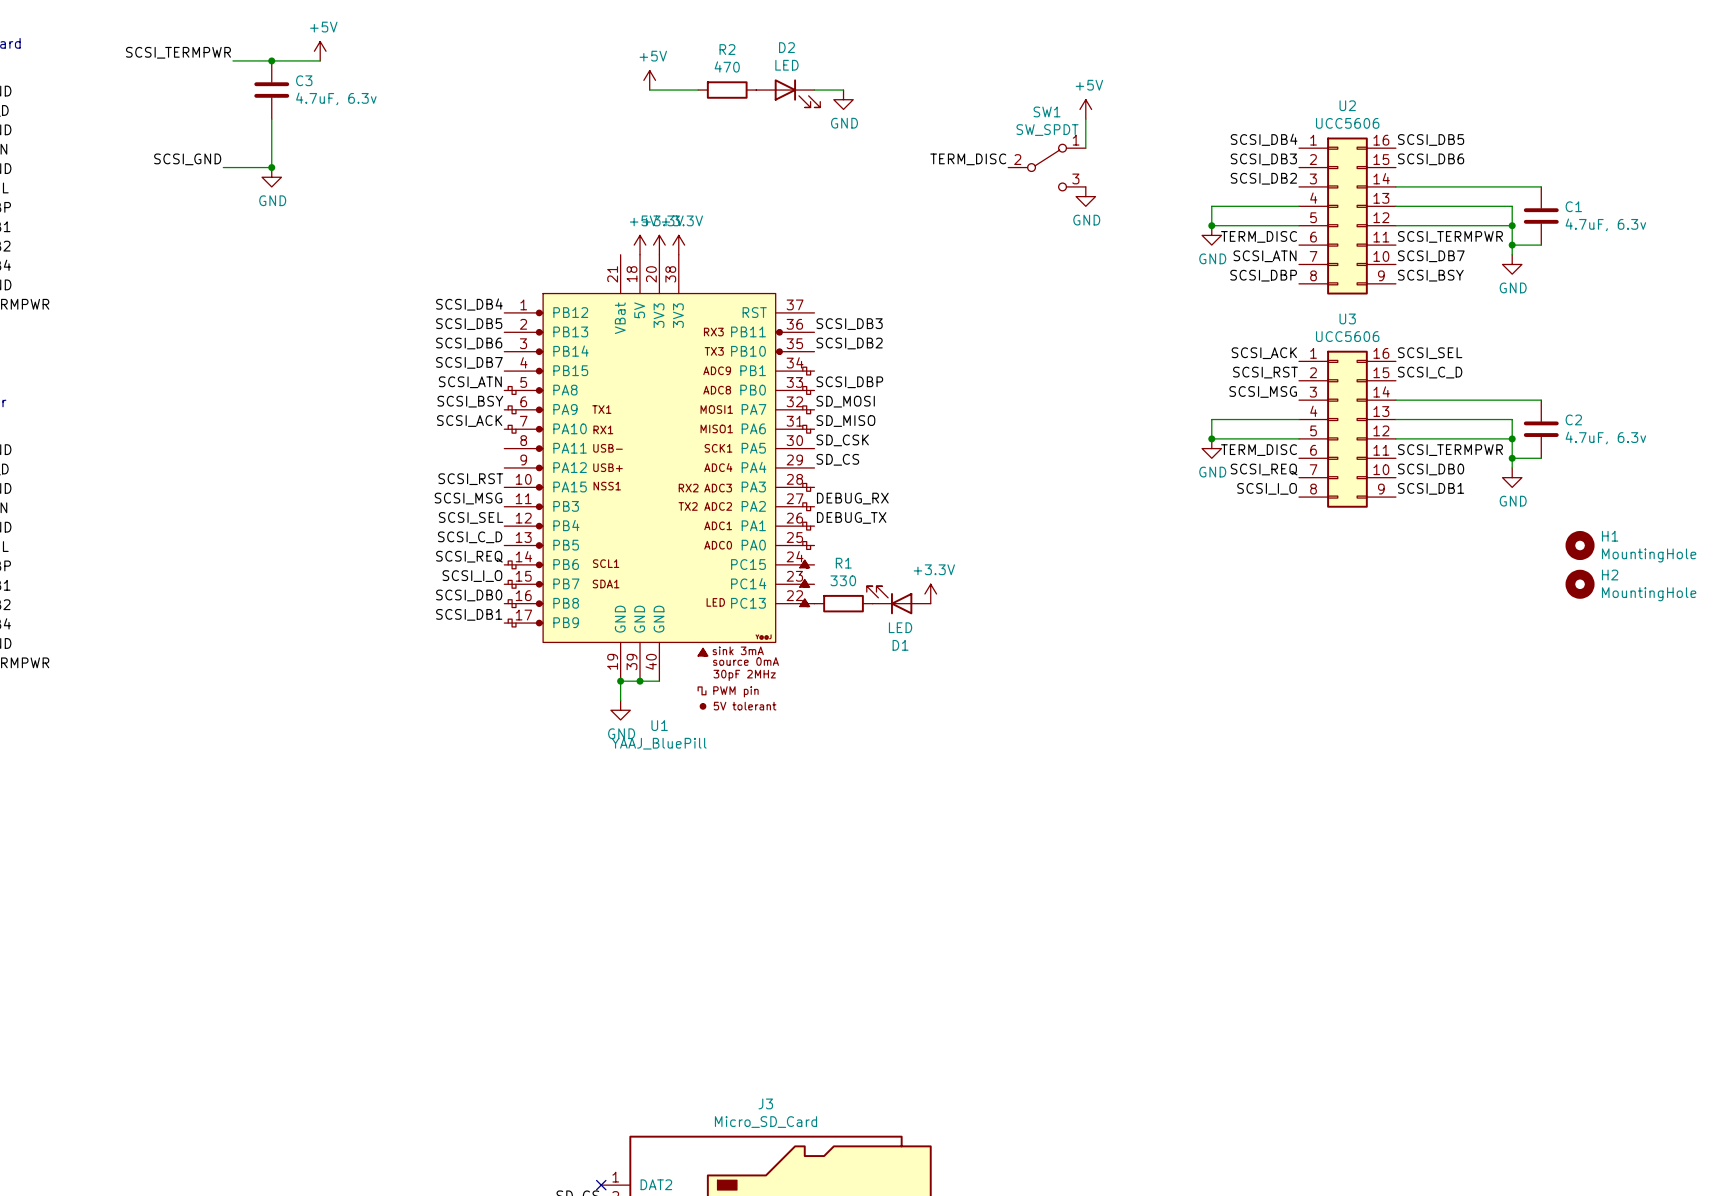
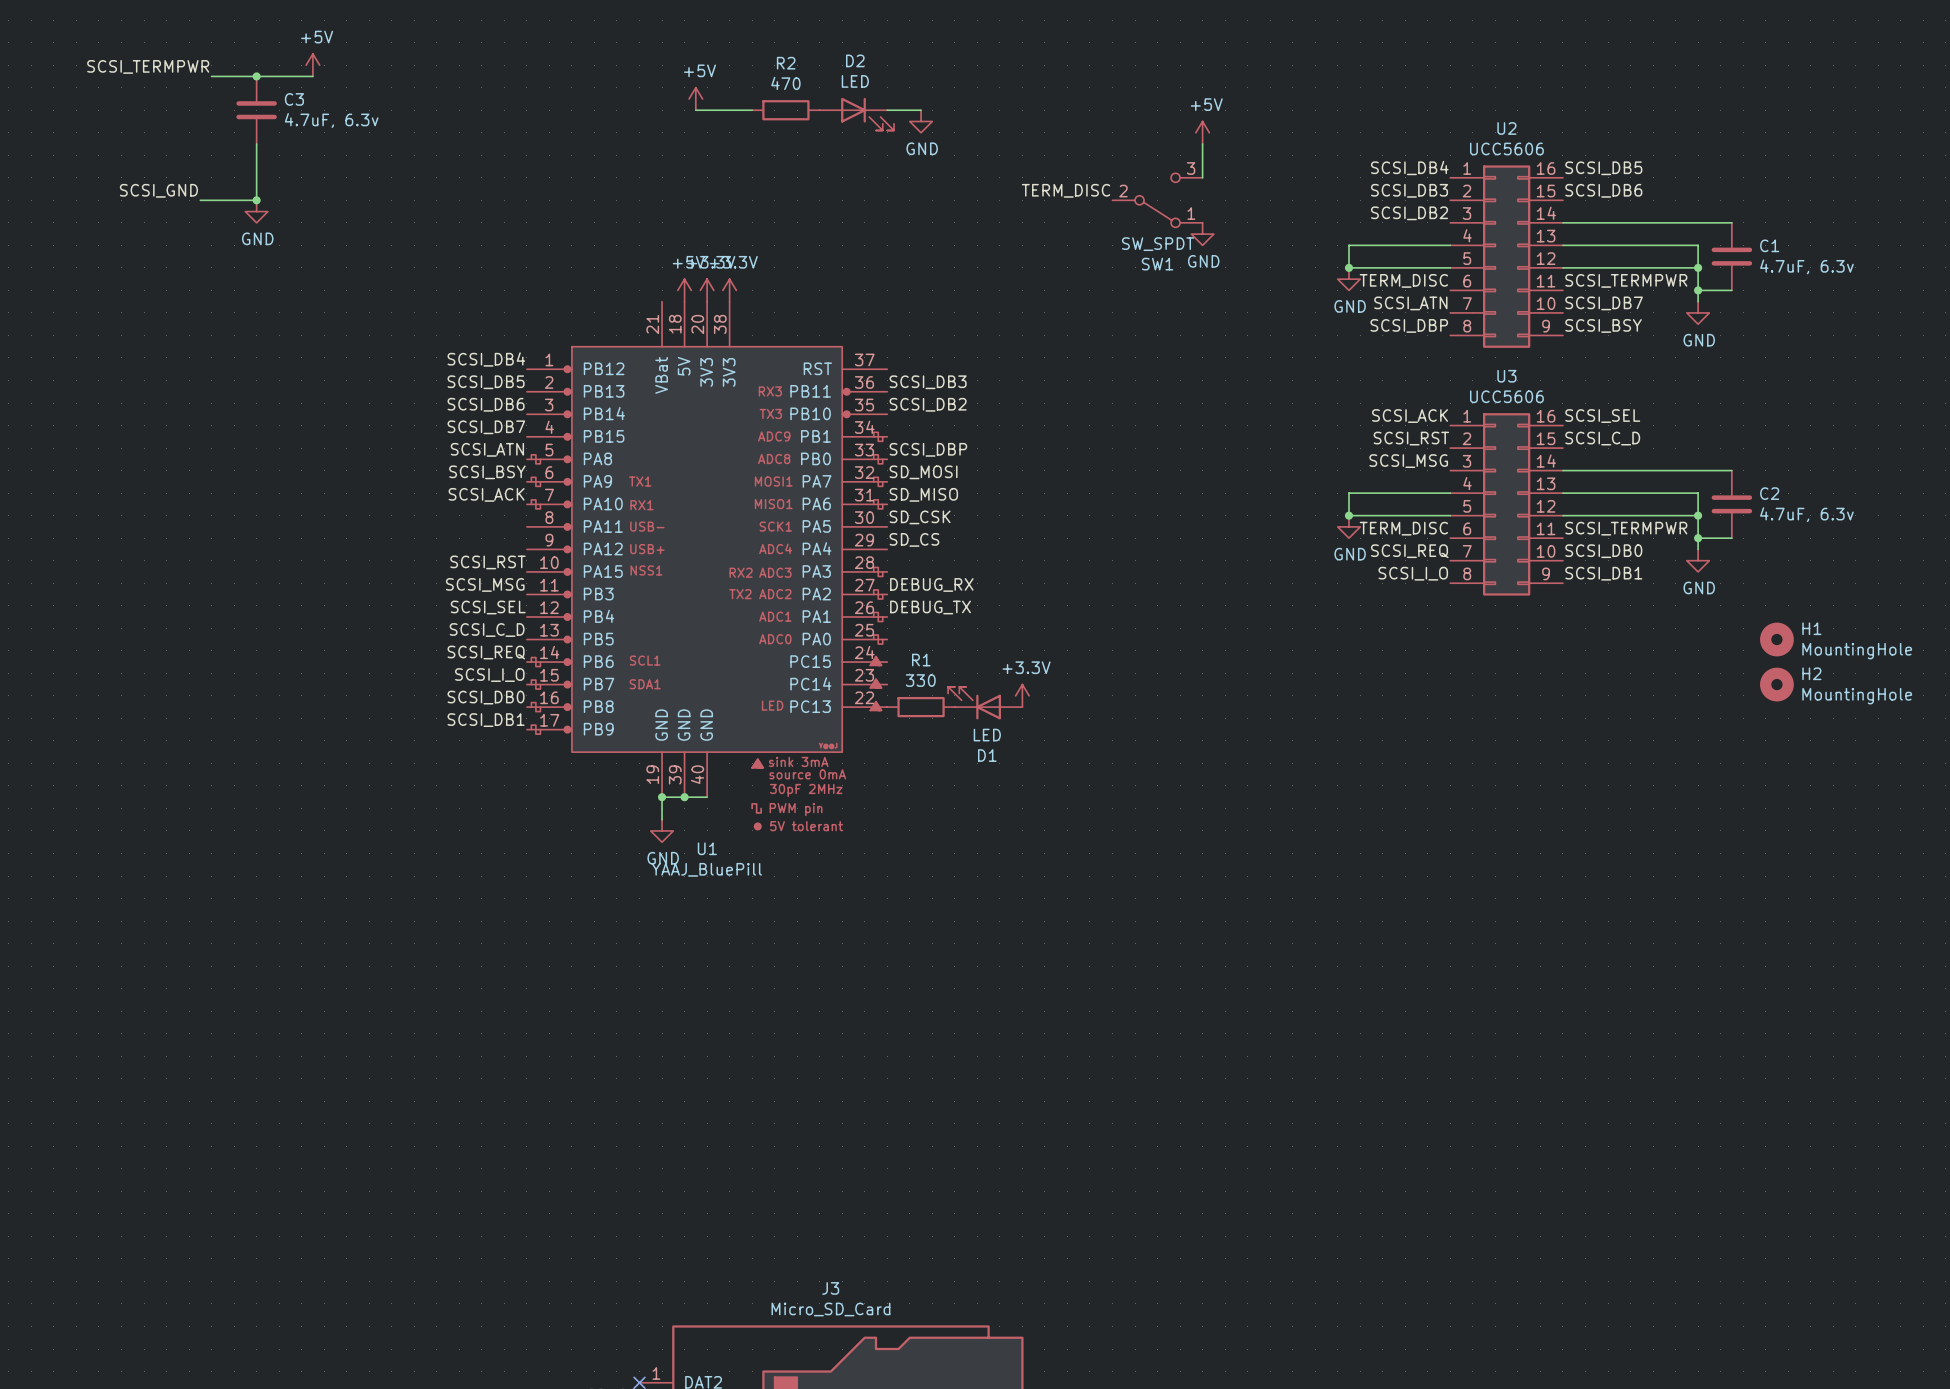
SW1 flip: as is (1047, 167) -> up-down (1157, 200)

